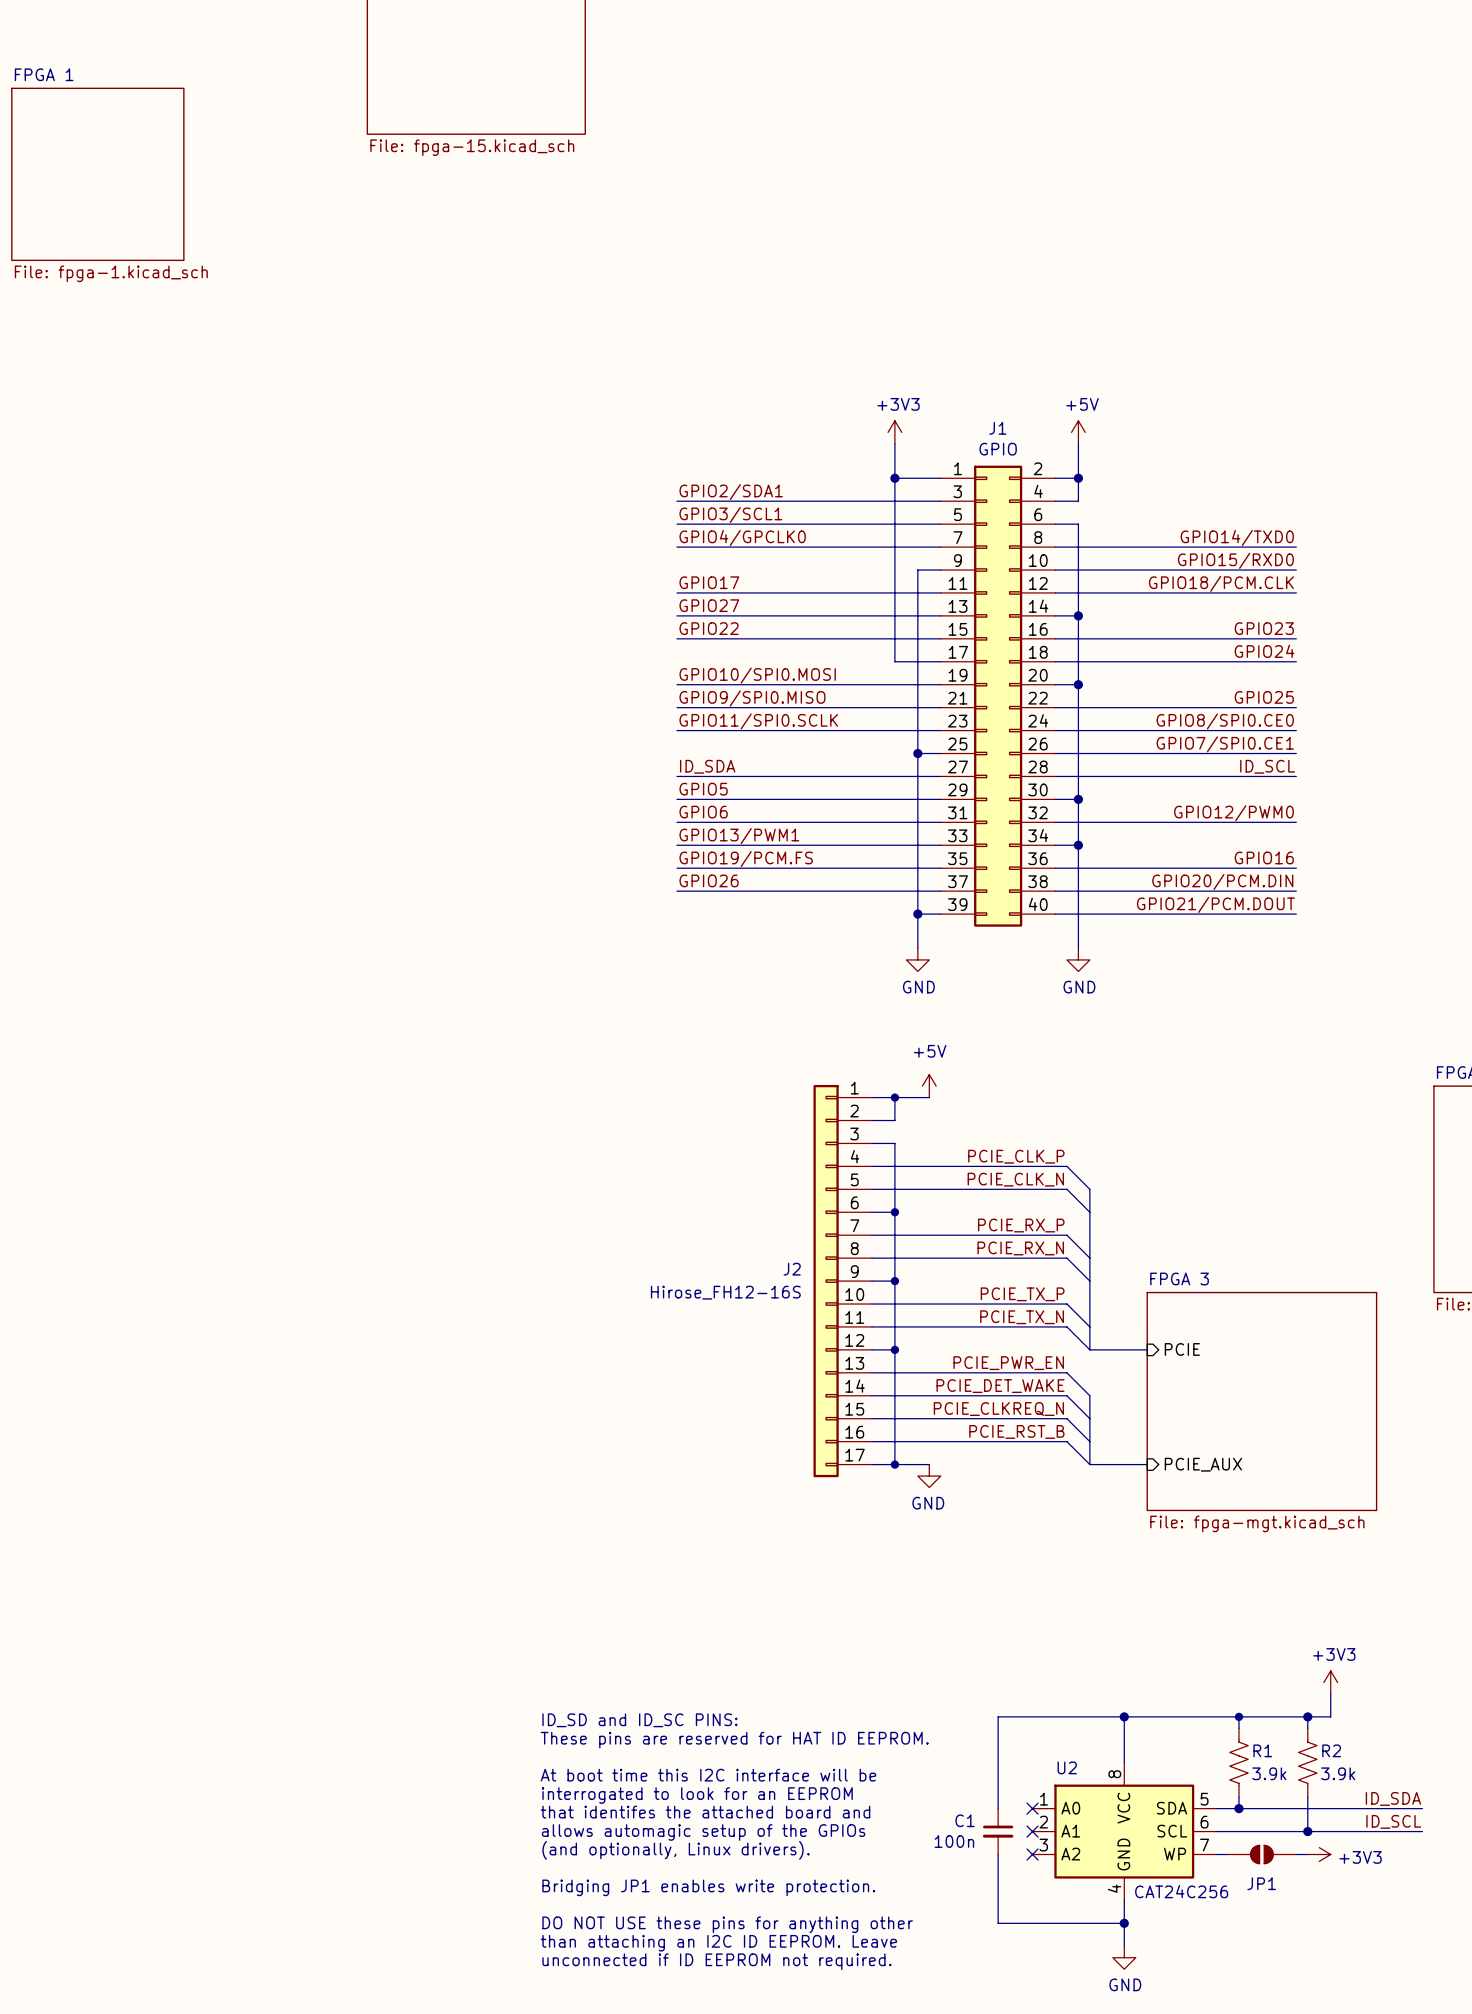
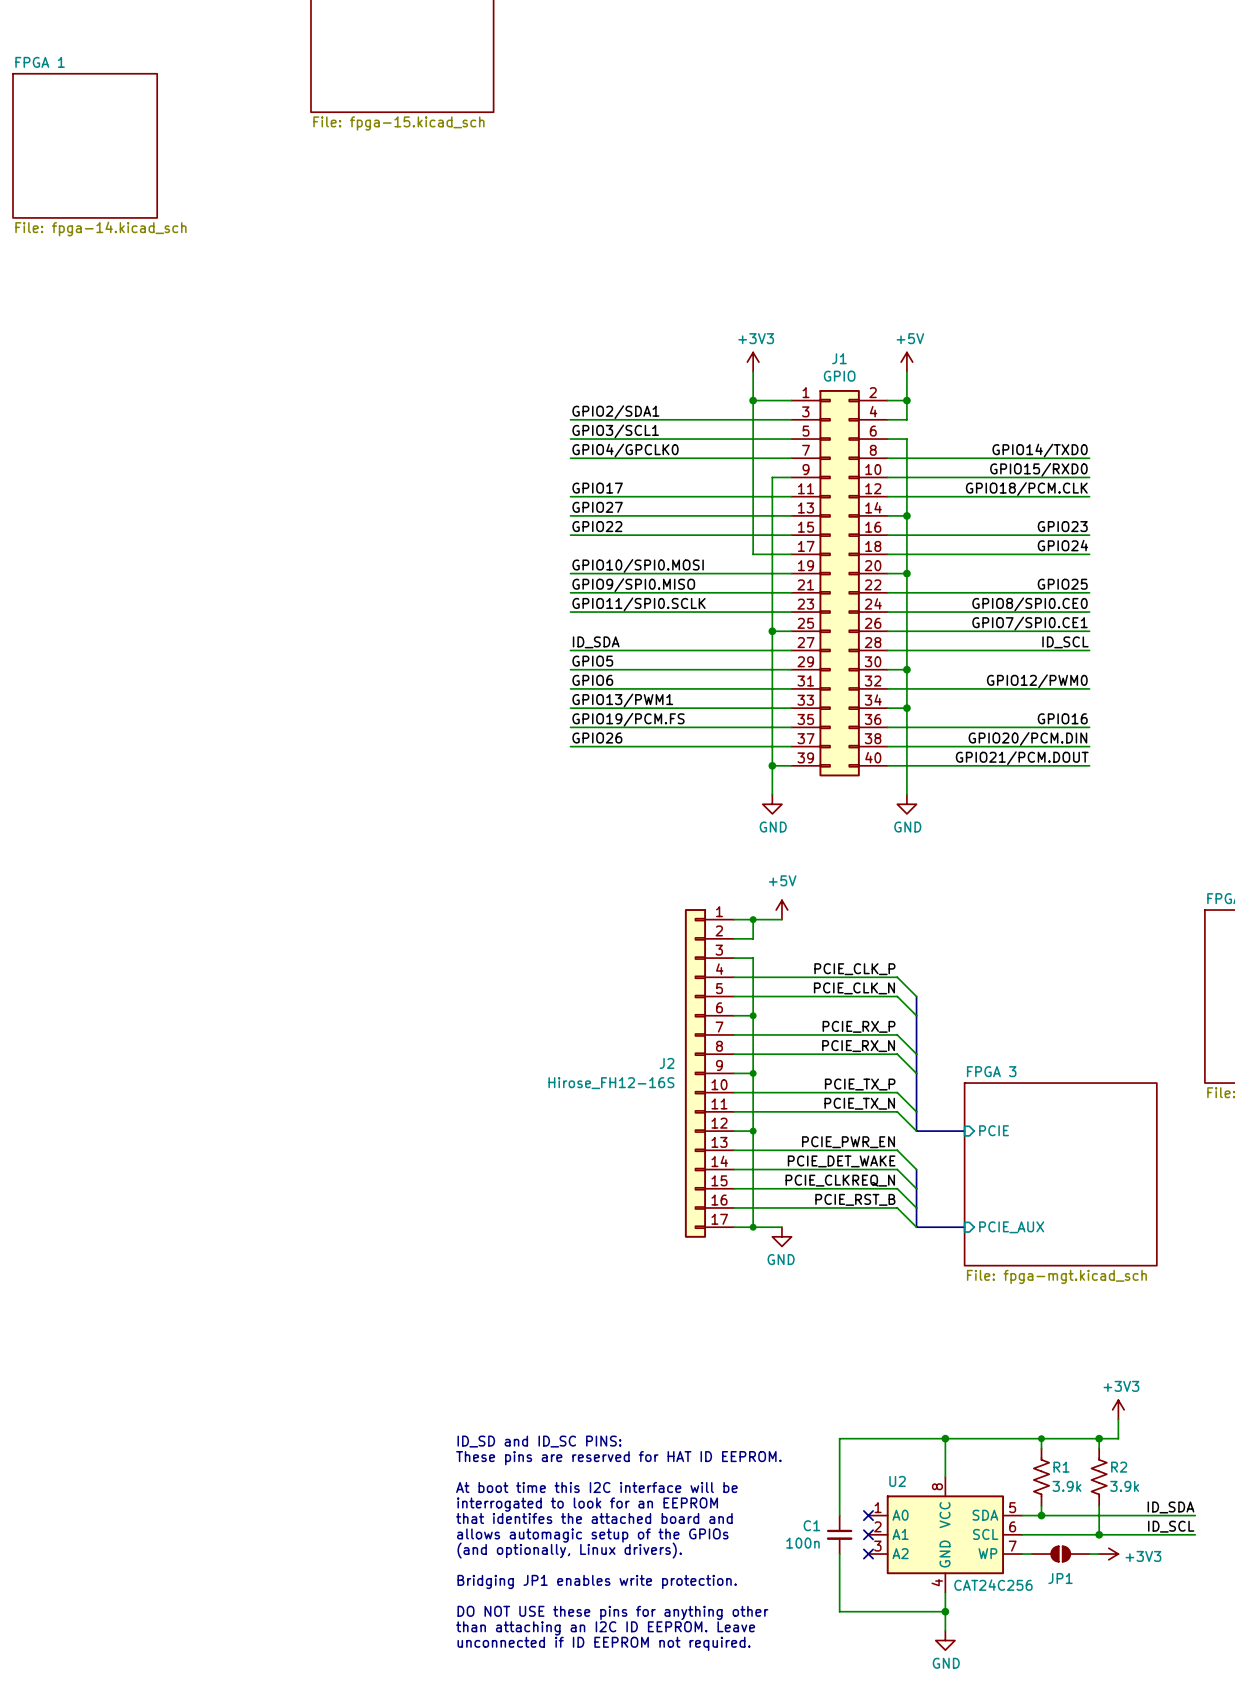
sheet FPGA 1 value: File: fpga-1.kicad_sch (111, 273) -> File: fpga-14.kicad_sch (100, 229)

